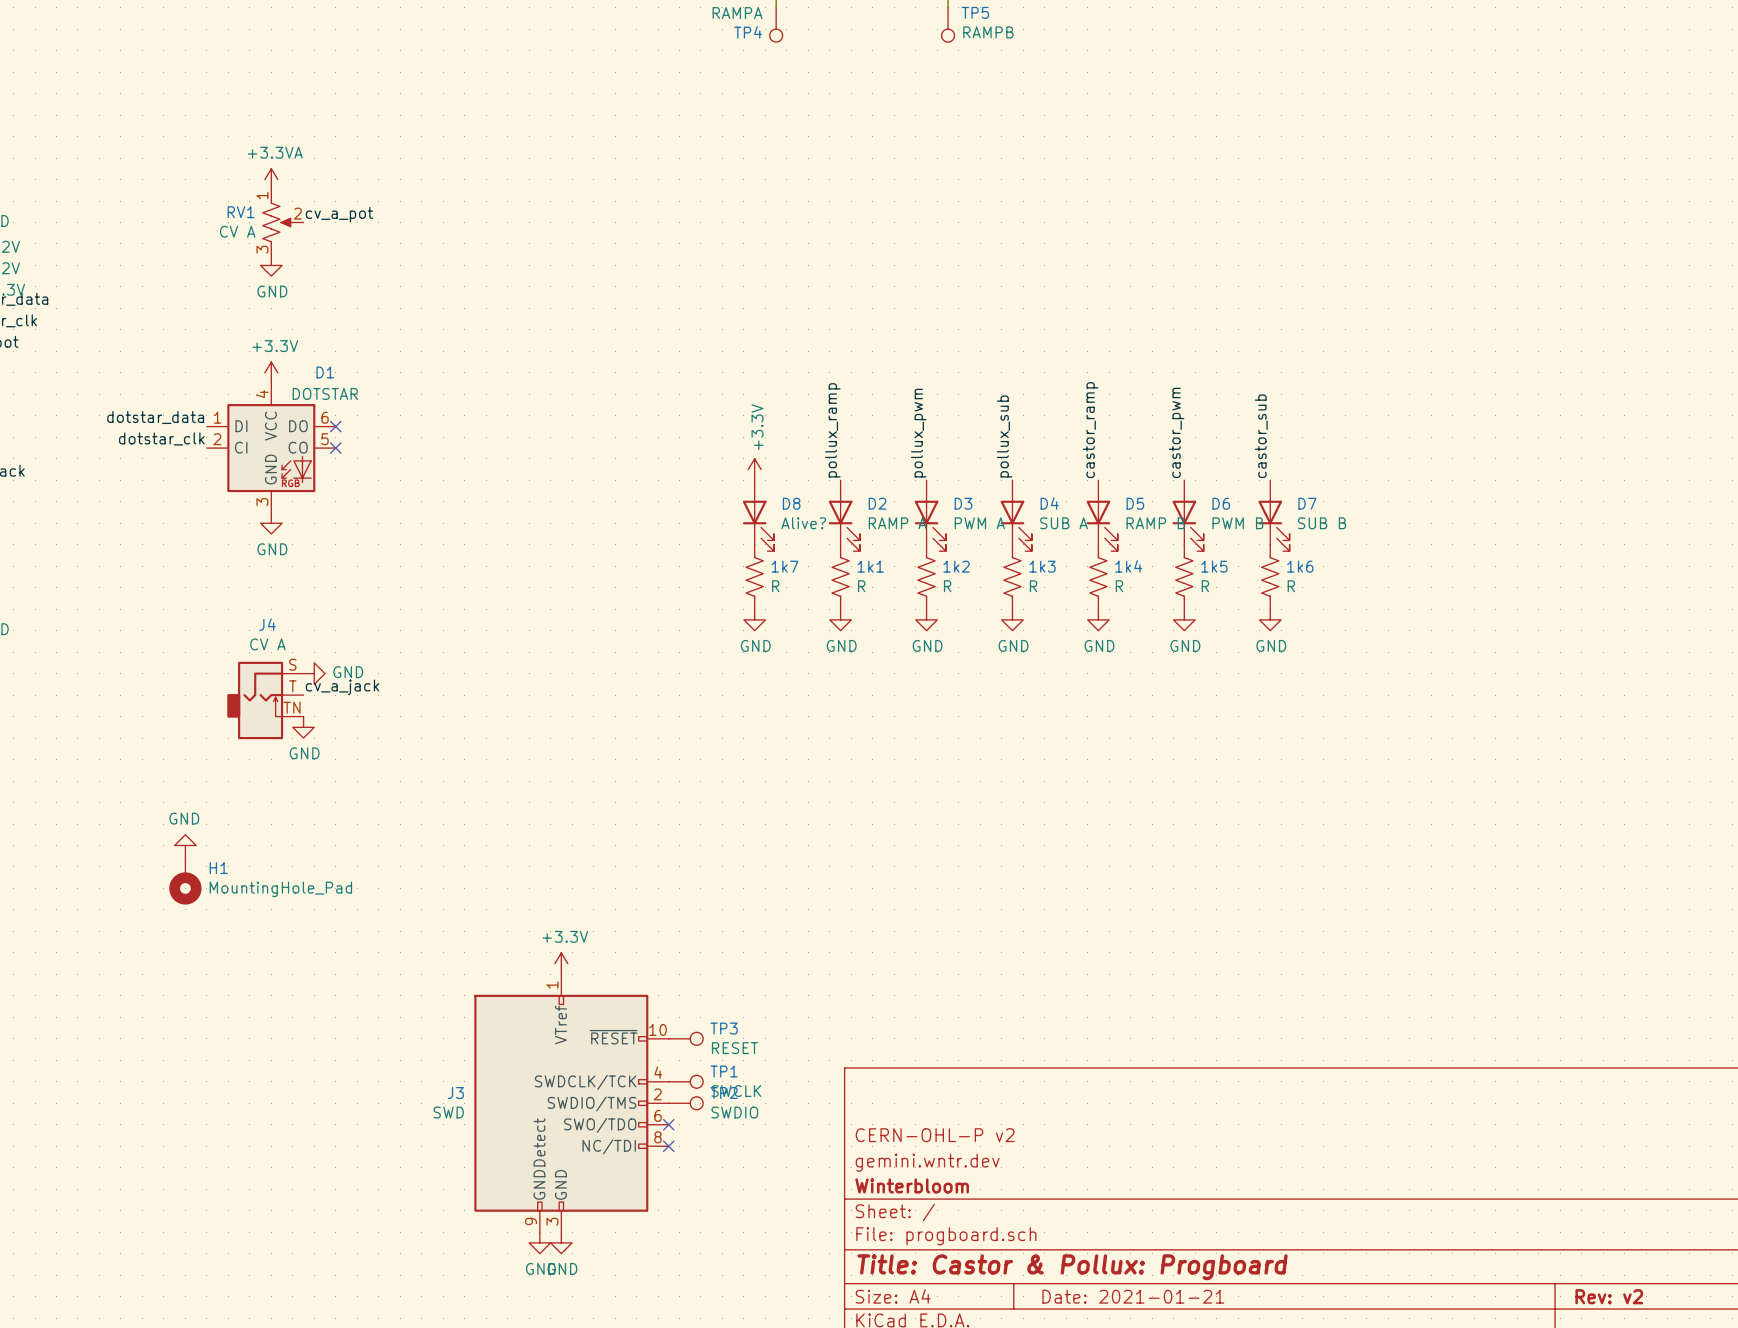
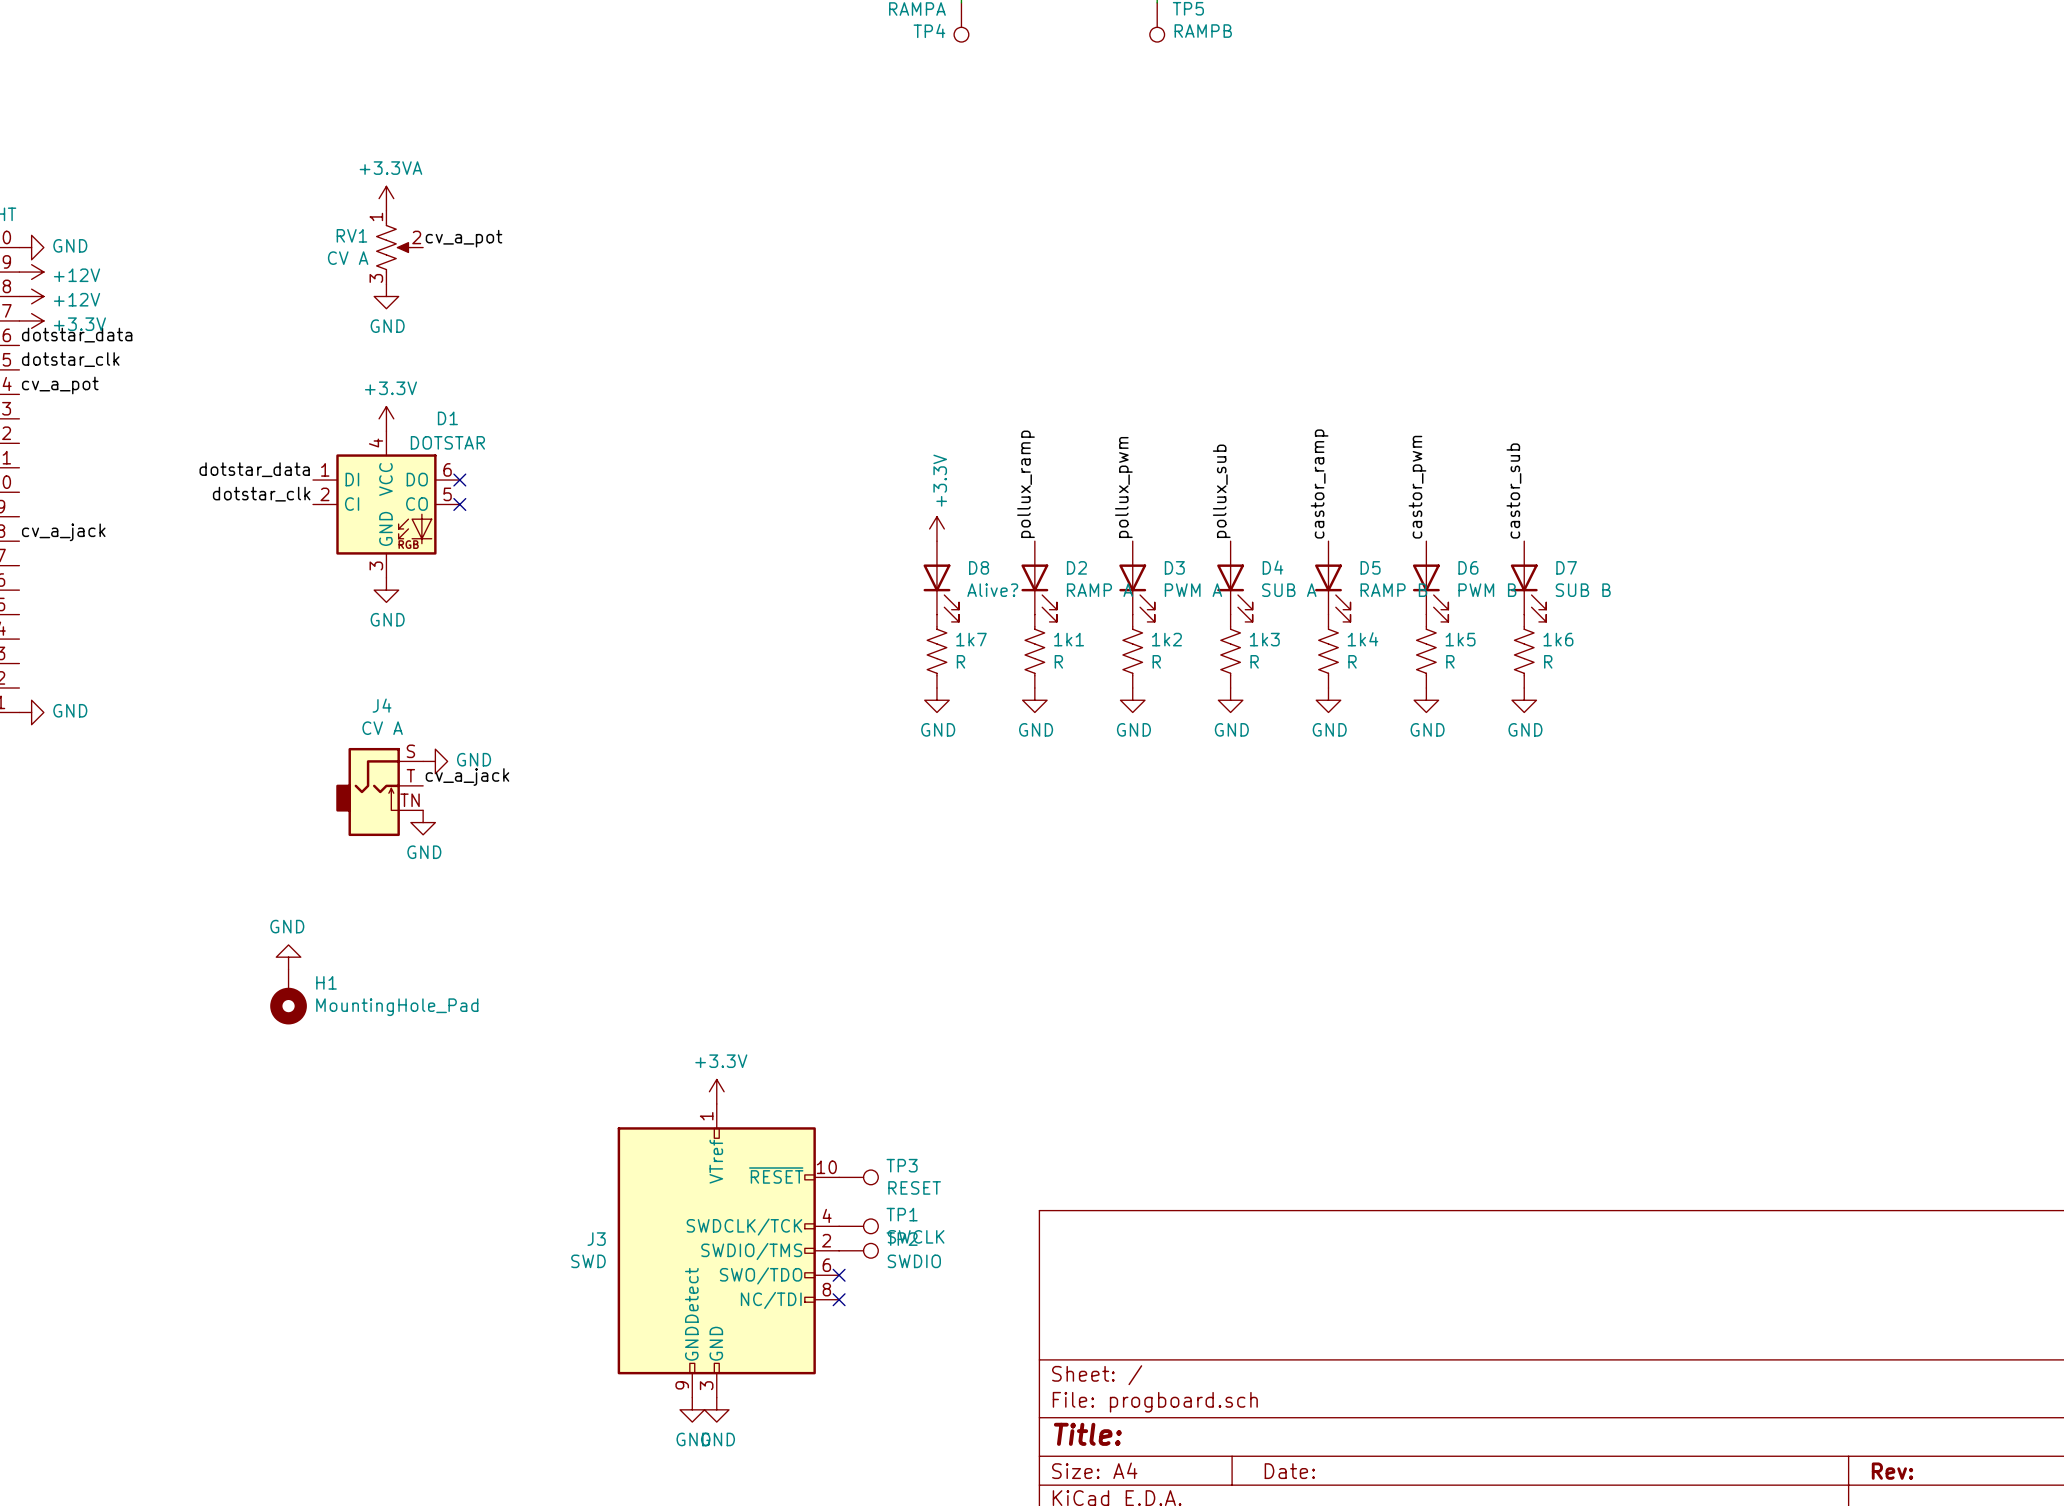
title block: CERN-OHL-P v2 (935, 1135) -> none
title block: gemini.wntr.dev (927, 1162) -> none
title block: Winterbloom (912, 1185) -> none
title block: Title: Castor & Pollux: Progboard (1072, 1267) -> Title: (1087, 1434)
title block: Date: 2021-01-21 (1133, 1296) -> Date: (1289, 1471)
title block: Rev: v2 (1609, 1296) -> Rev: (1892, 1471)

